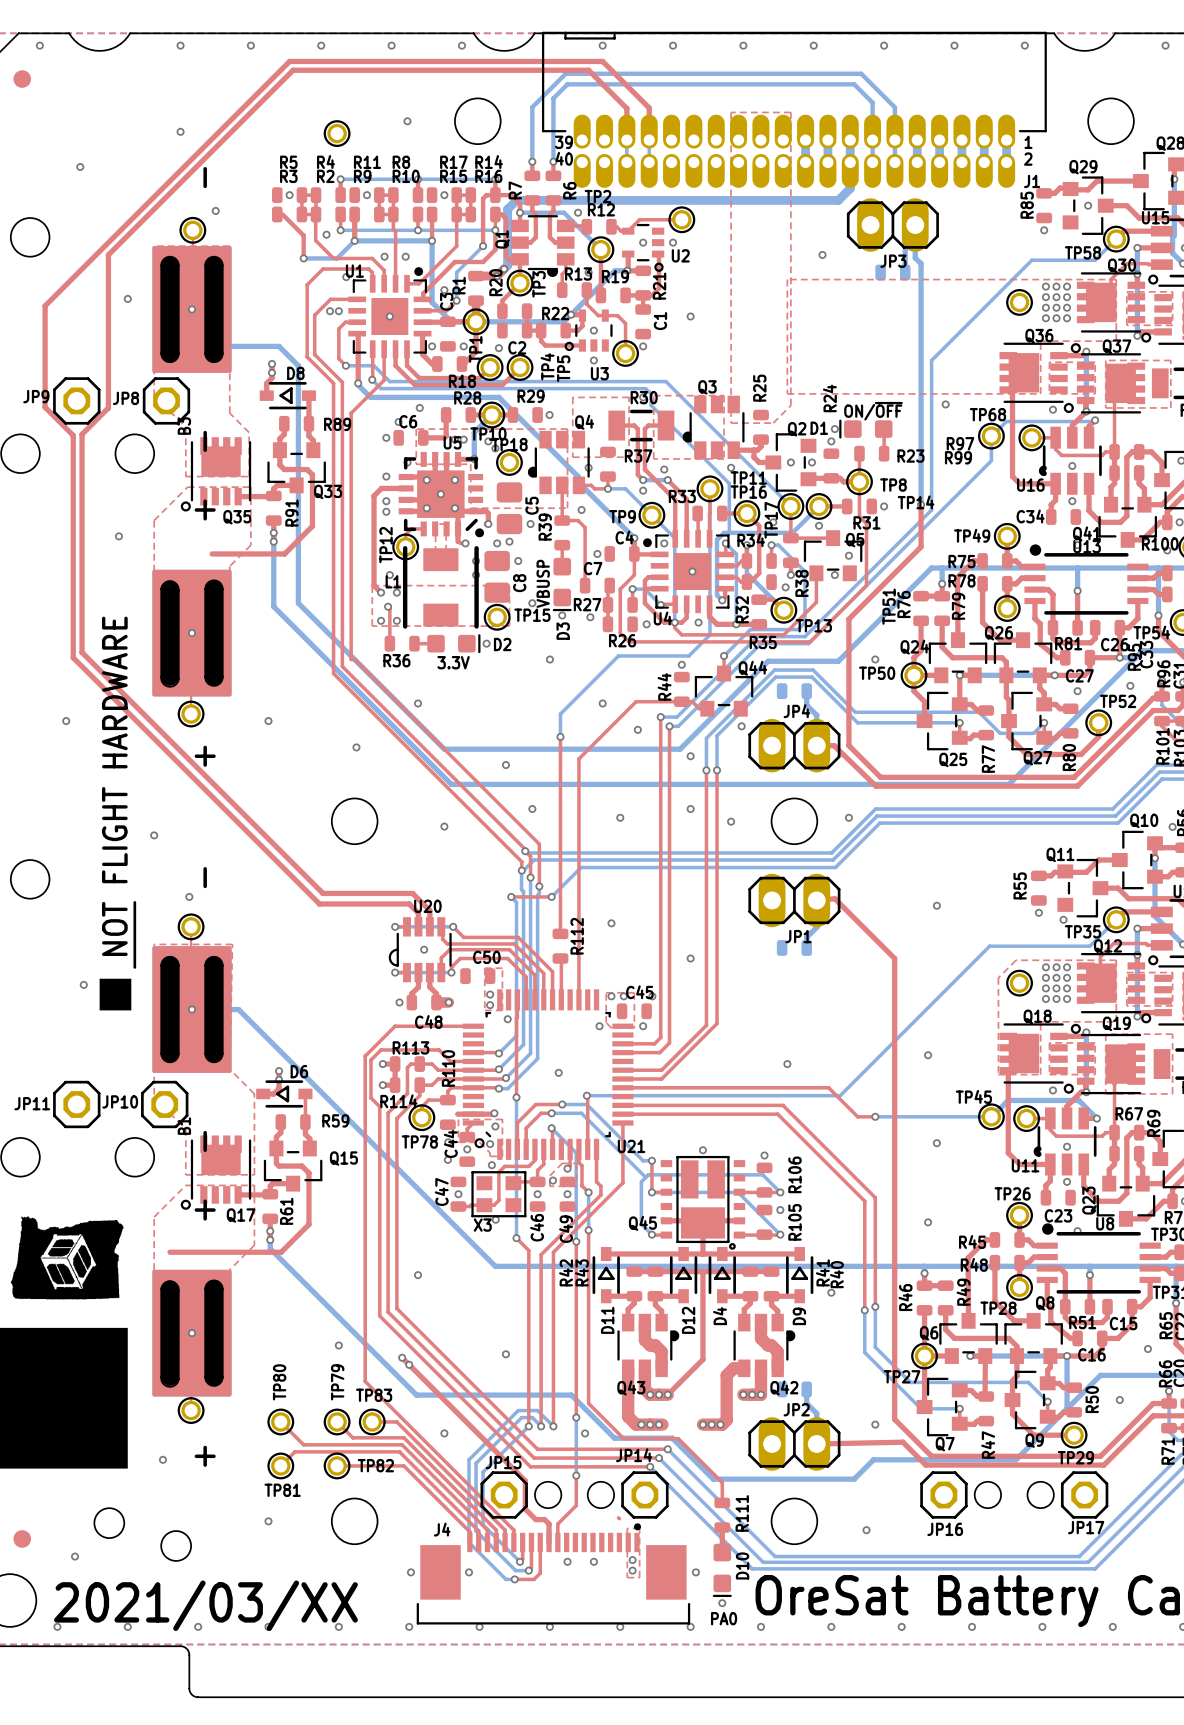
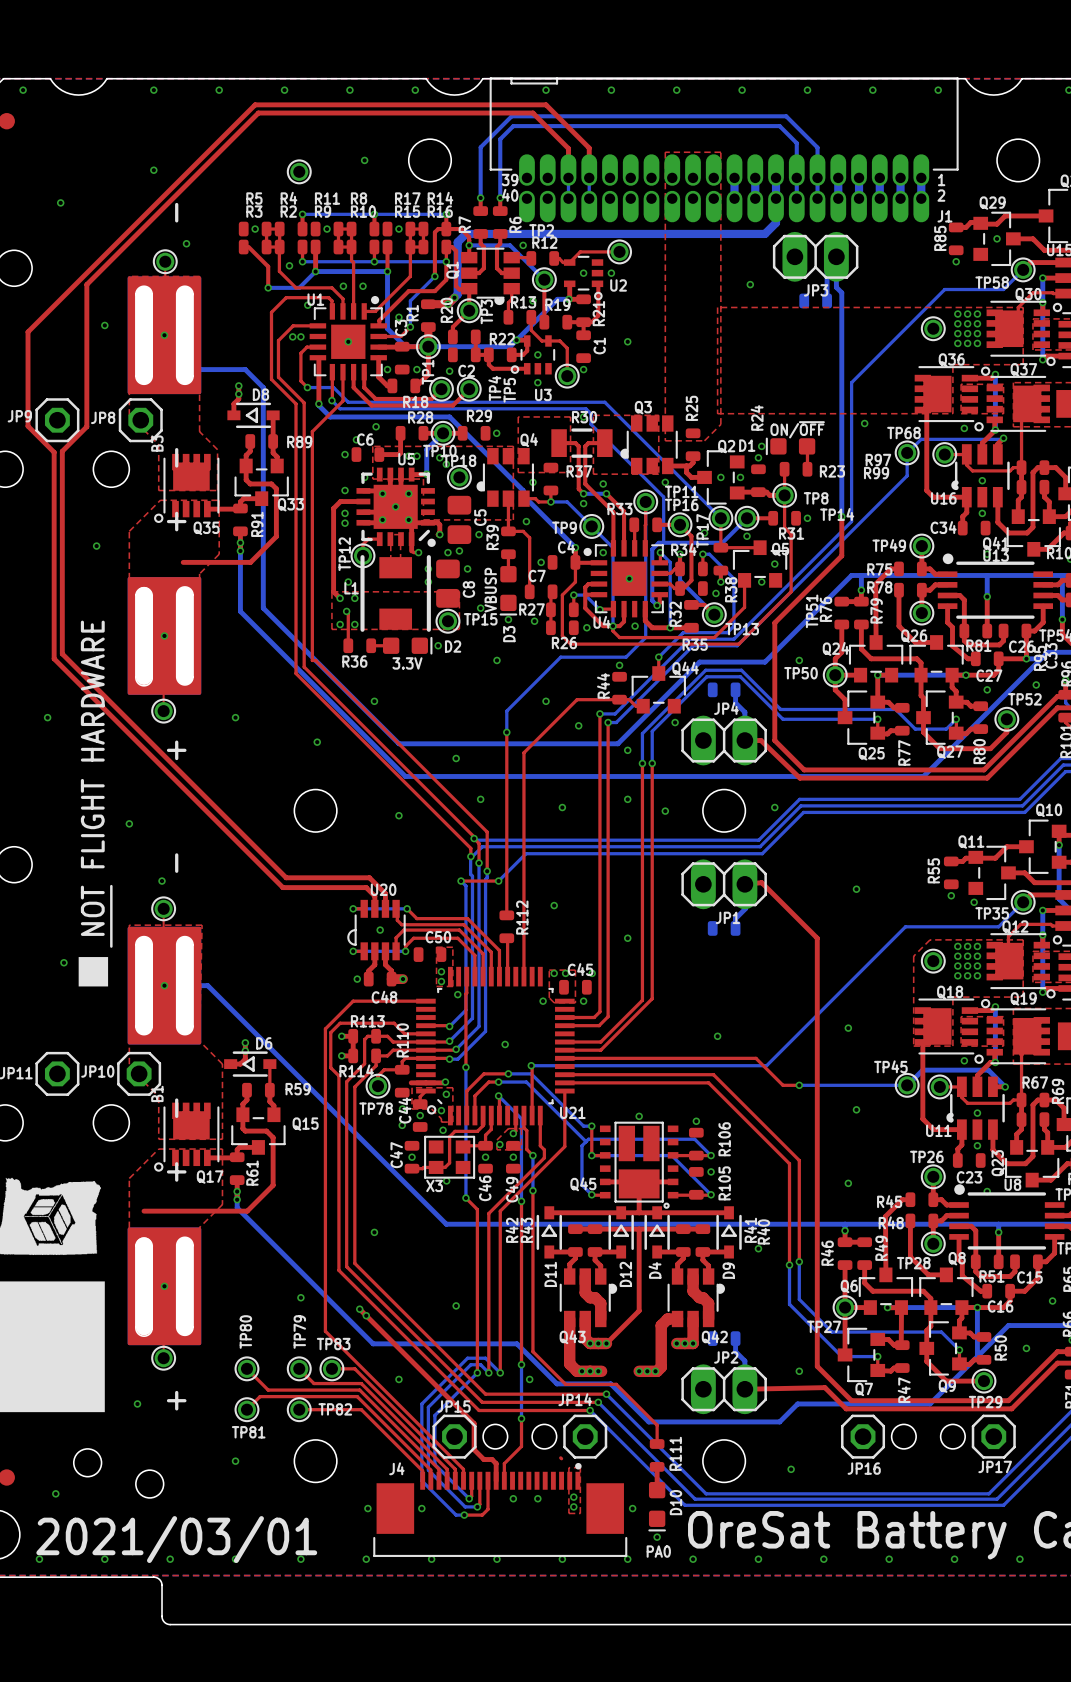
text: 2021/03/XX (205, 1605) -> 2021/03/01 (176, 1539)

